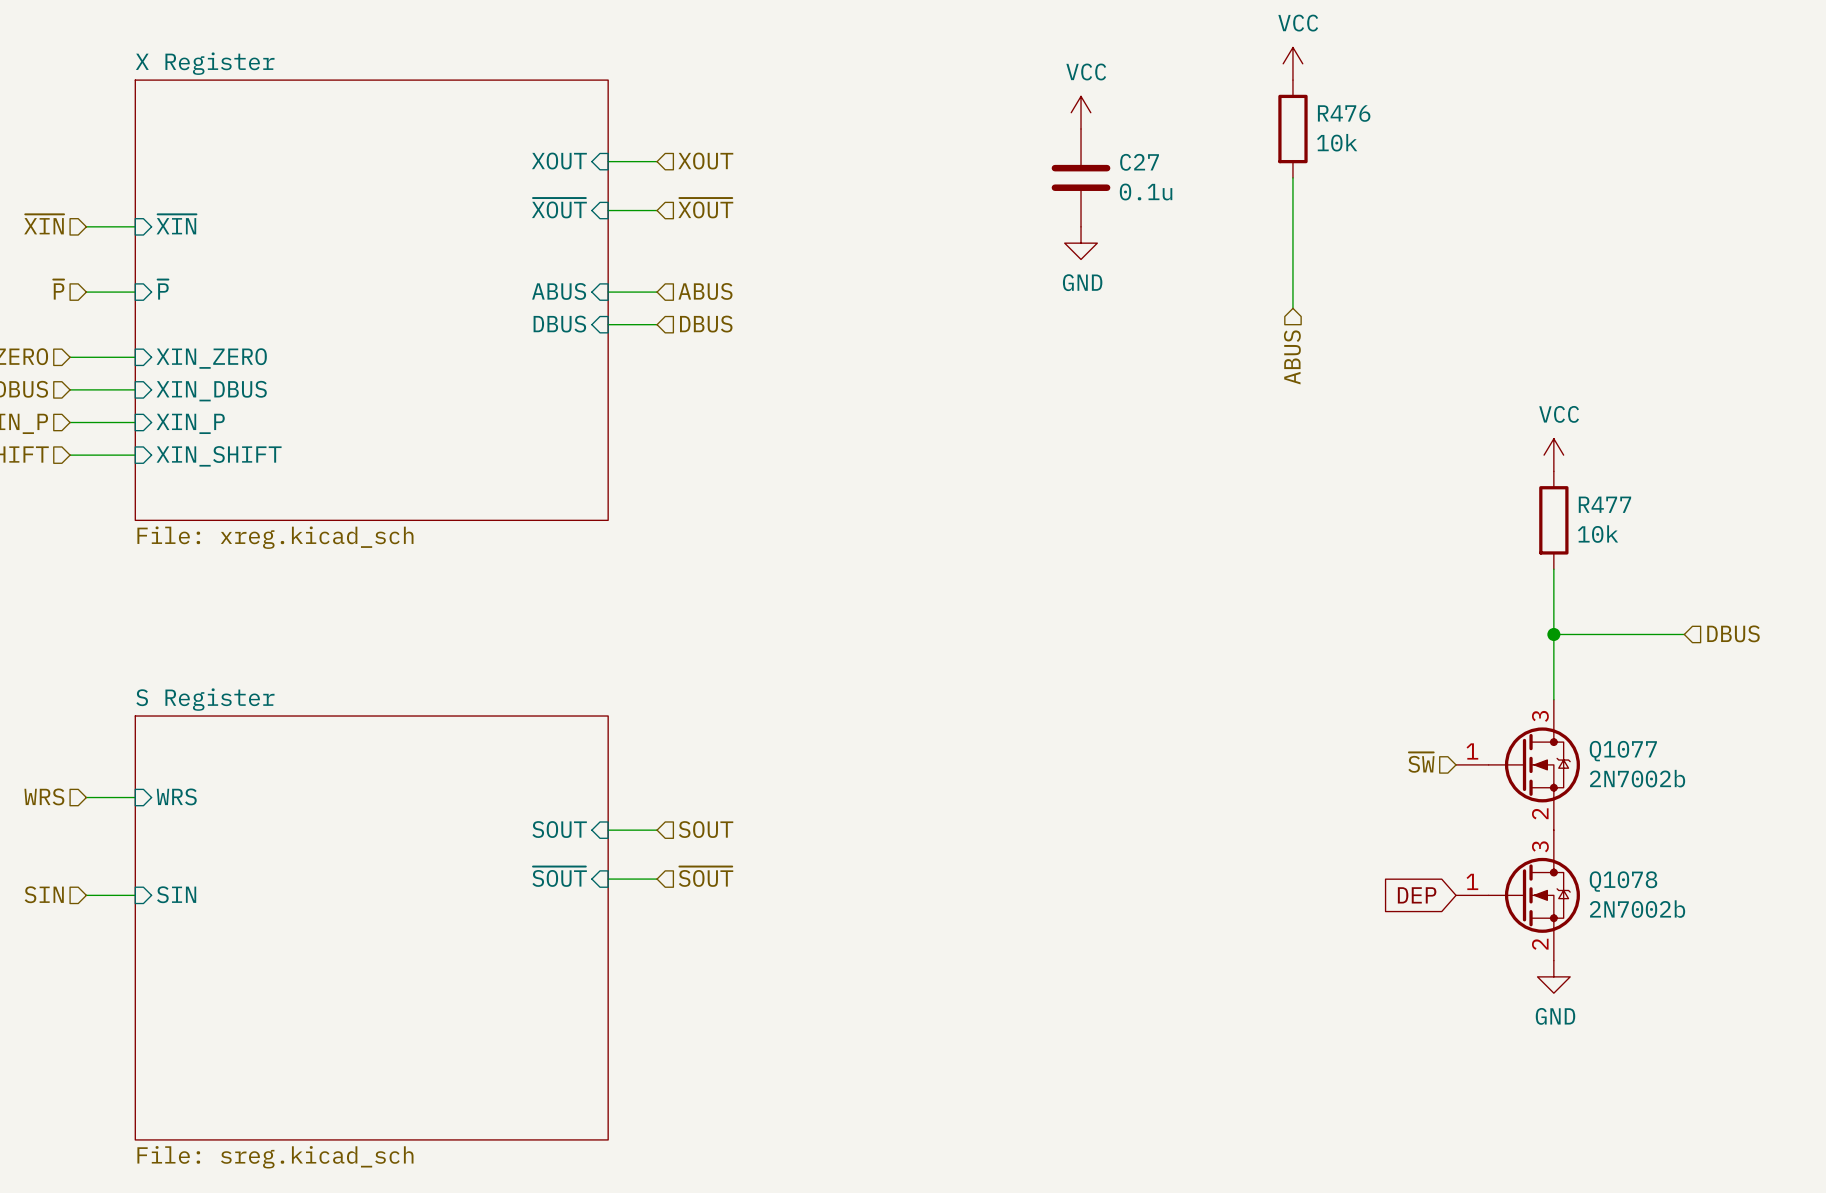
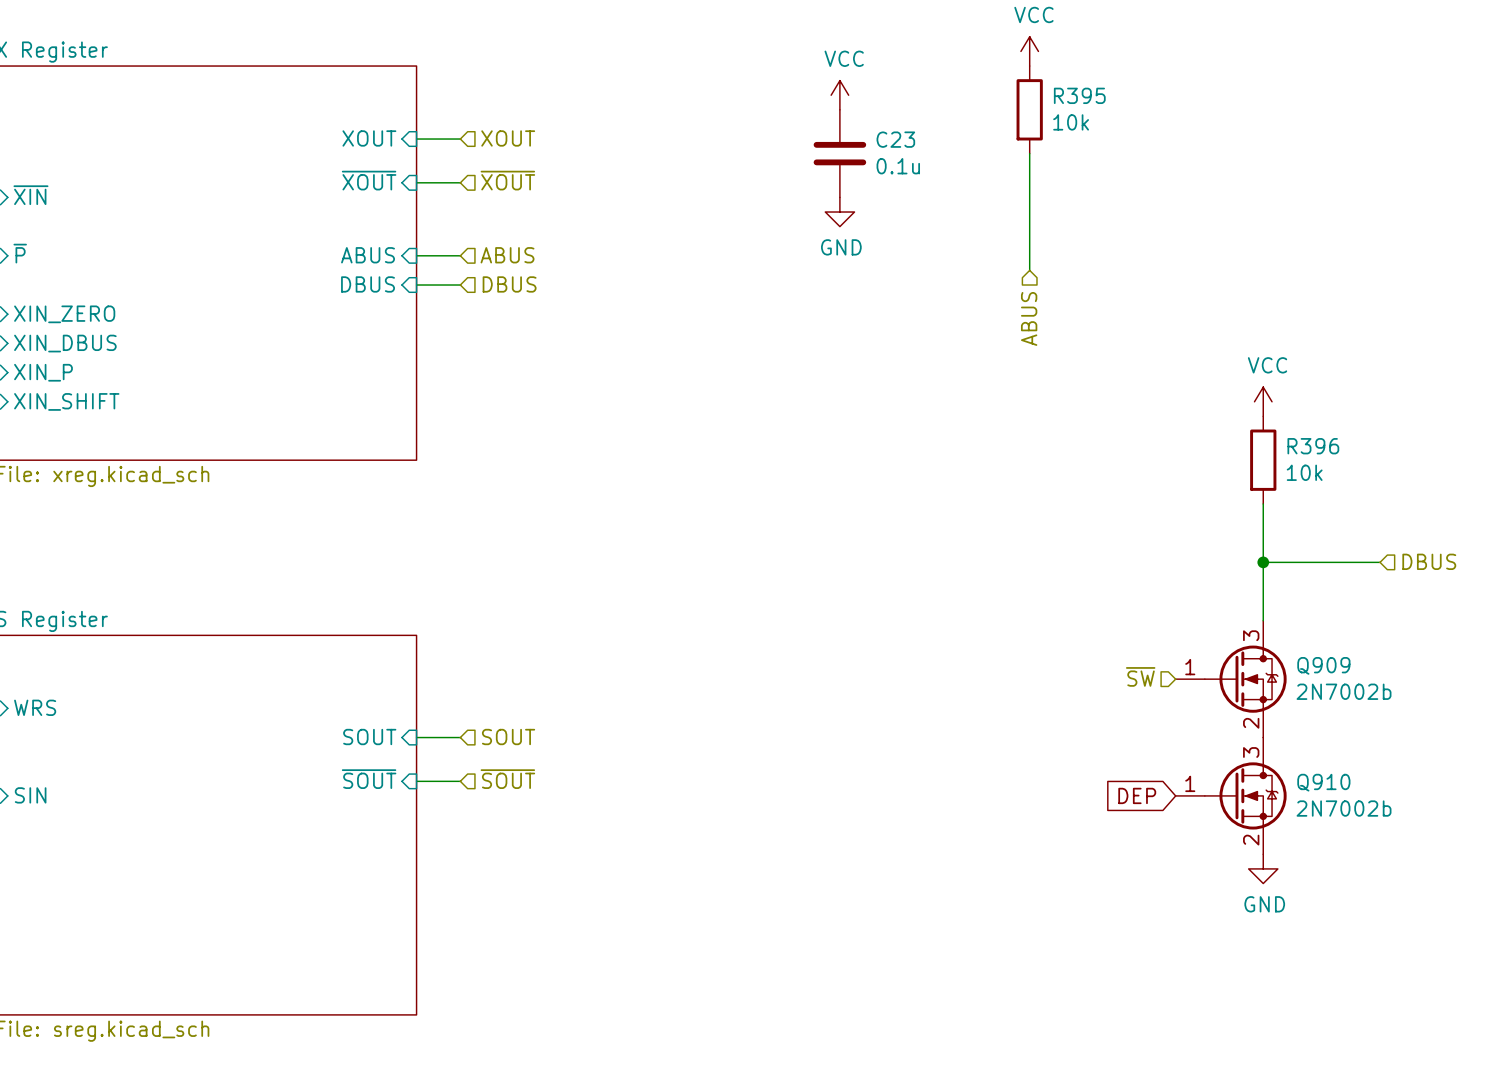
R476 name: R476 (1344, 113) -> R395 (1079, 95)
C27 name: C27 (1139, 162) -> C23 (895, 139)
R477 name: R477 (1604, 504) -> R396 (1313, 446)
Q1077 name: Q1077 (1623, 751) -> Q909 (1323, 665)
Q1078 name: Q1078 (1623, 881) -> Q910 (1323, 782)

